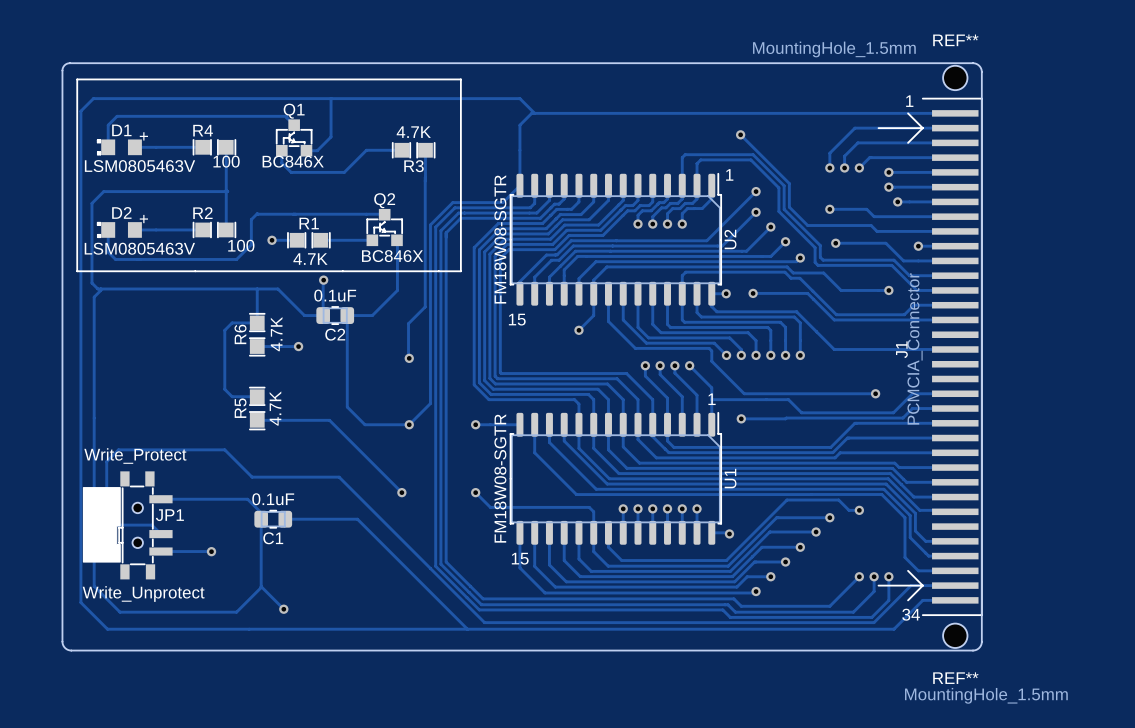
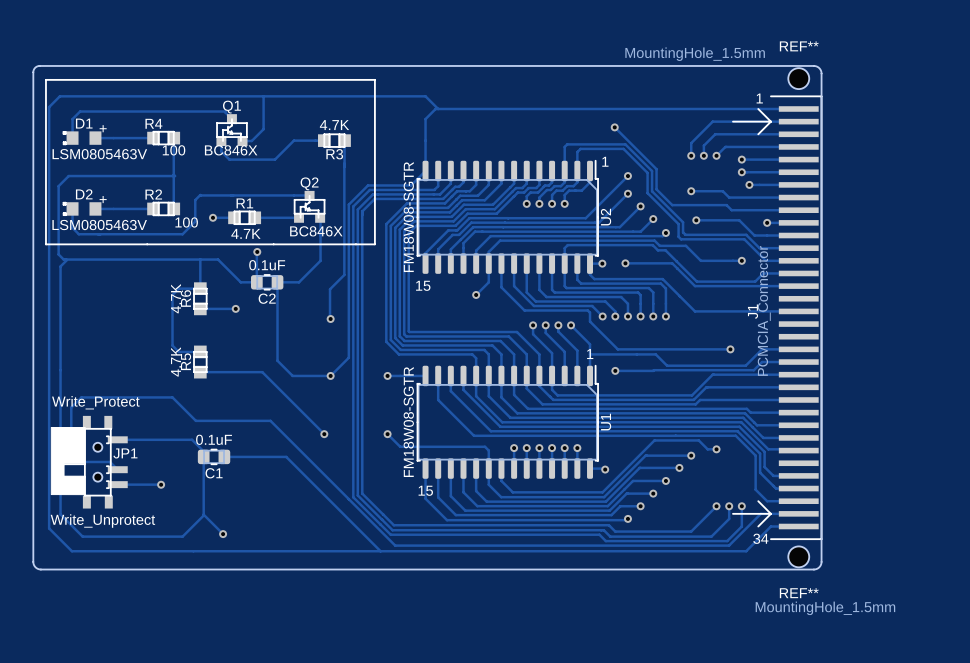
Q1 footprint: [276, 119, 313, 157] -> [216, 114, 248, 147]
R4 footprint: [192, 139, 237, 156] -> [147, 131, 181, 146]
R3 footprint: [392, 142, 436, 159] -> [317, 133, 351, 148]
Q2 footprint: [366, 208, 403, 247] -> [294, 190, 326, 223]
R2 footprint: [192, 221, 237, 239] -> [147, 202, 181, 216]
R1 footprint: [287, 232, 331, 249] -> [228, 210, 262, 225]
R6 footprint: [249, 313, 266, 357] -> [193, 282, 208, 316]
R6 value position: 4.7K (276, 334) -> 4.7K (176, 298)
R5 footprint: [249, 386, 266, 431] -> [193, 345, 208, 379]
R5 value position: 4.7K (275, 408) -> 4.7K (176, 361)
JP1 footprint: [118, 471, 173, 580] -> [62, 415, 128, 509]
drawing shape: [82, 487, 121, 563] -> [50, 426, 86, 496]

